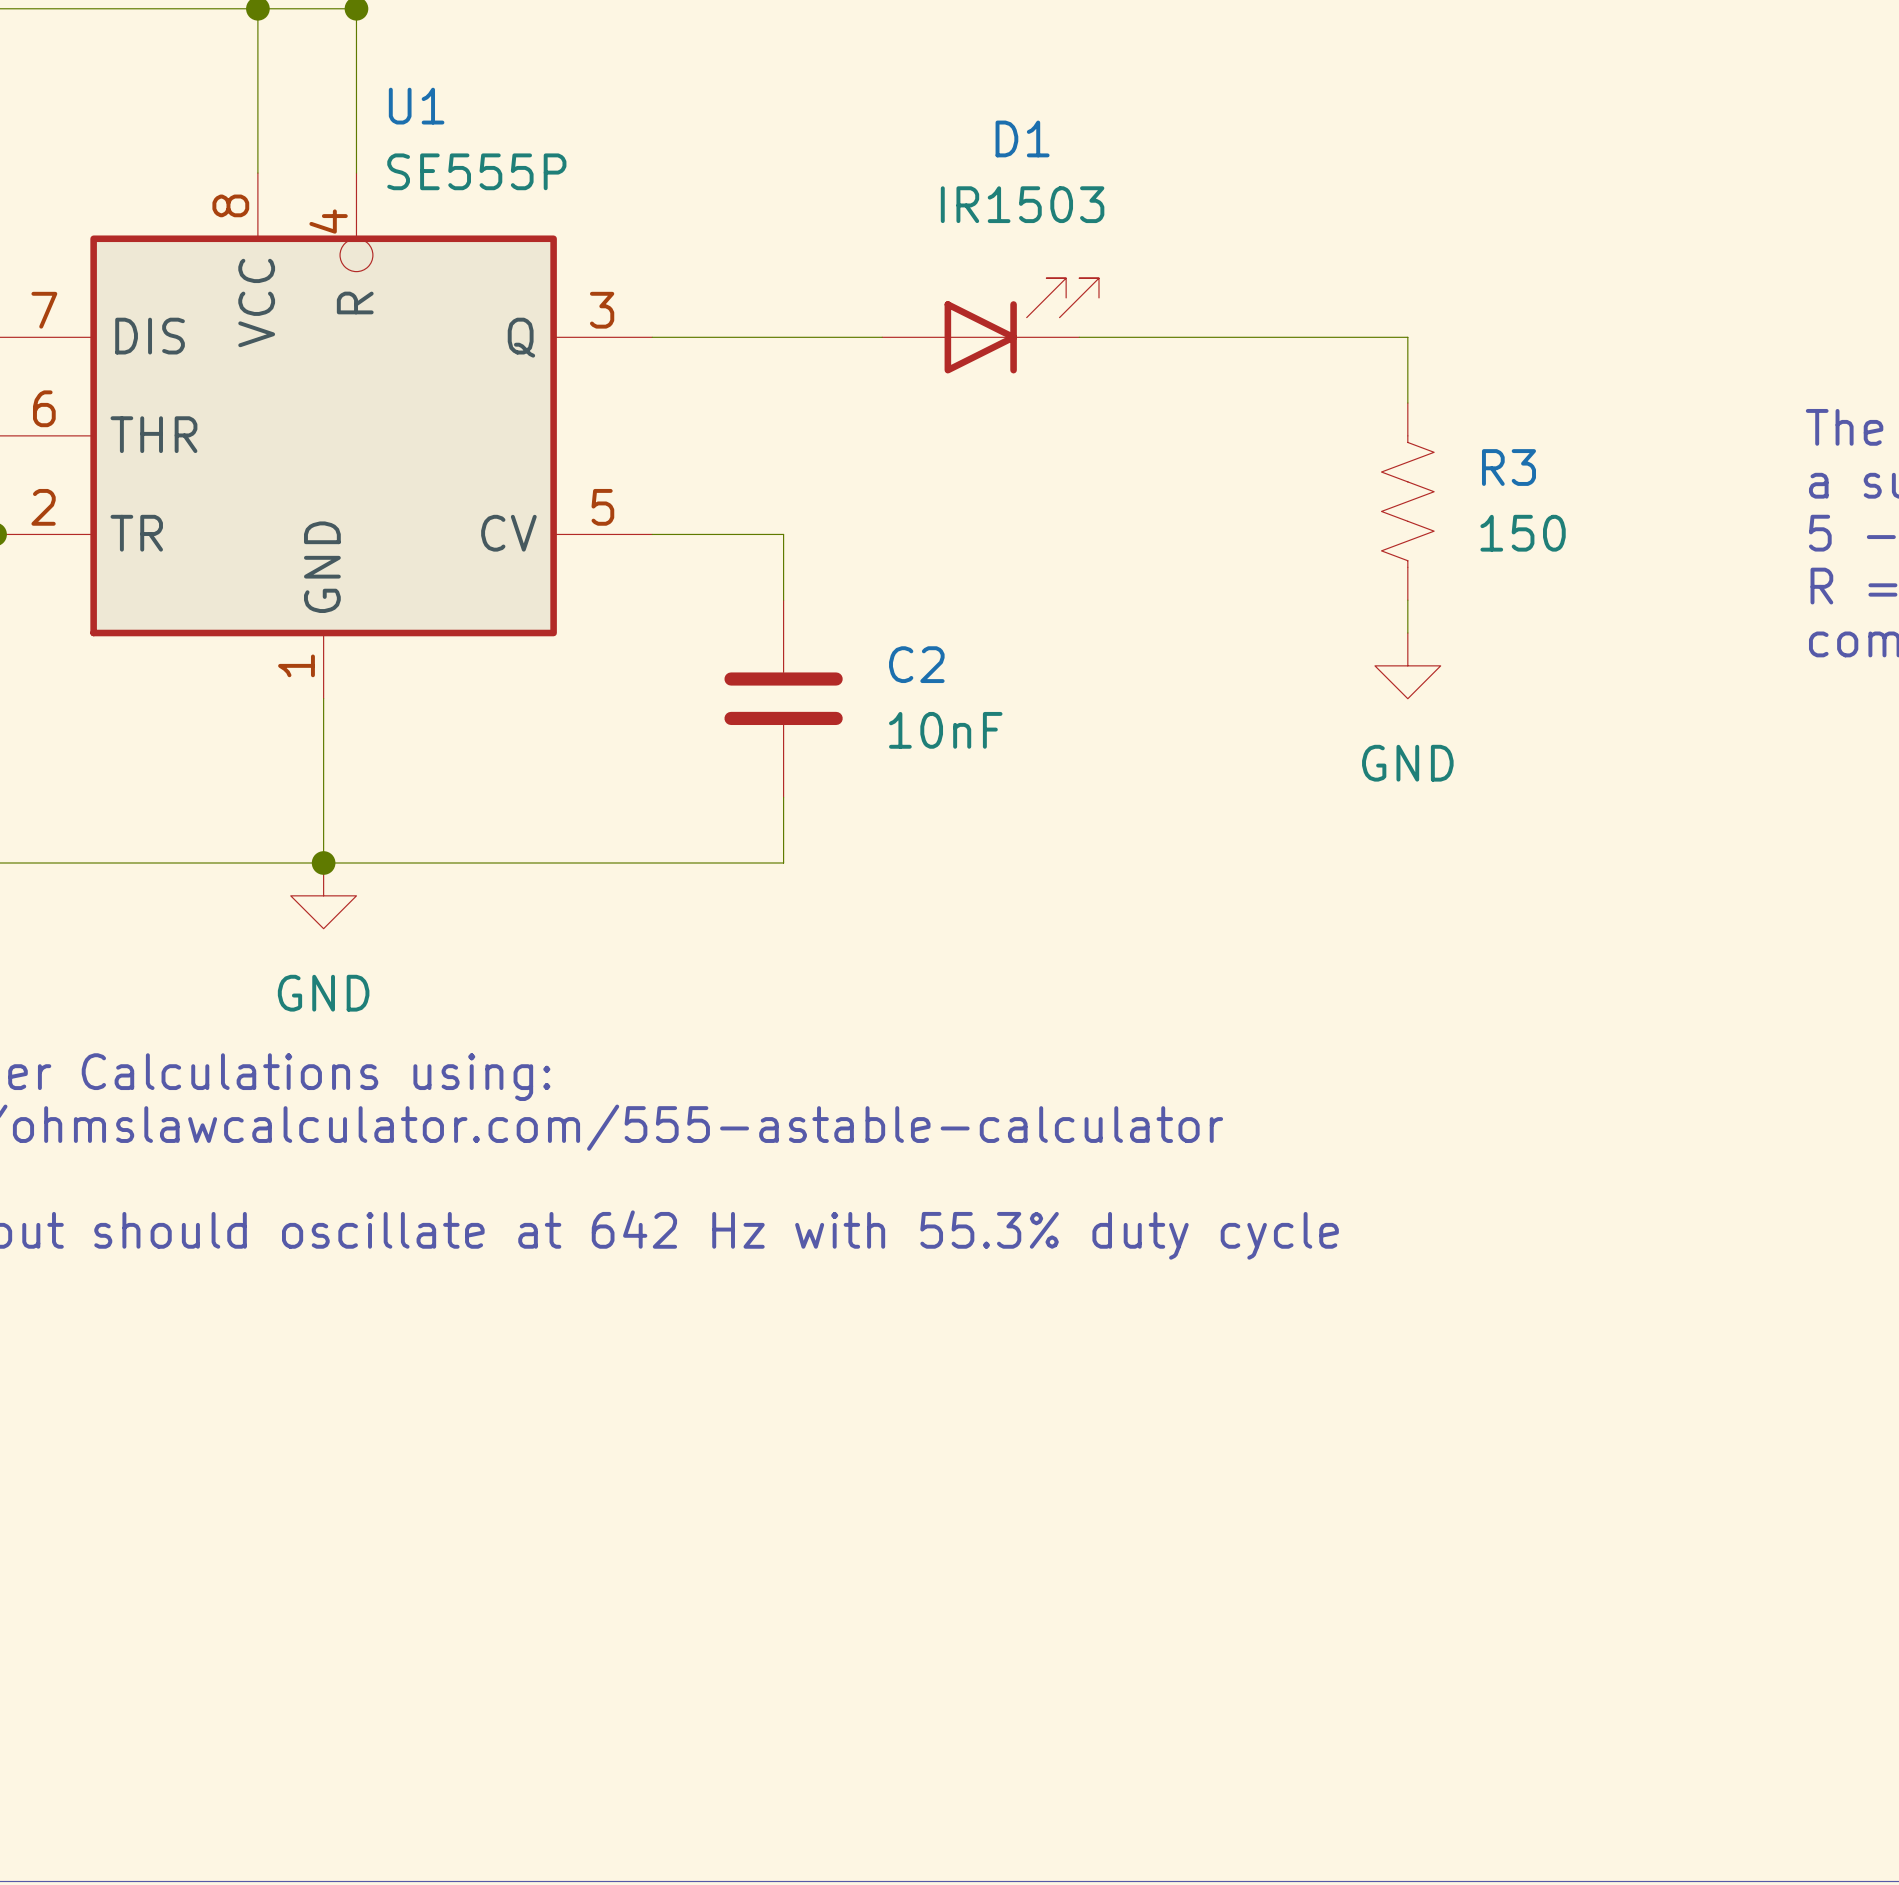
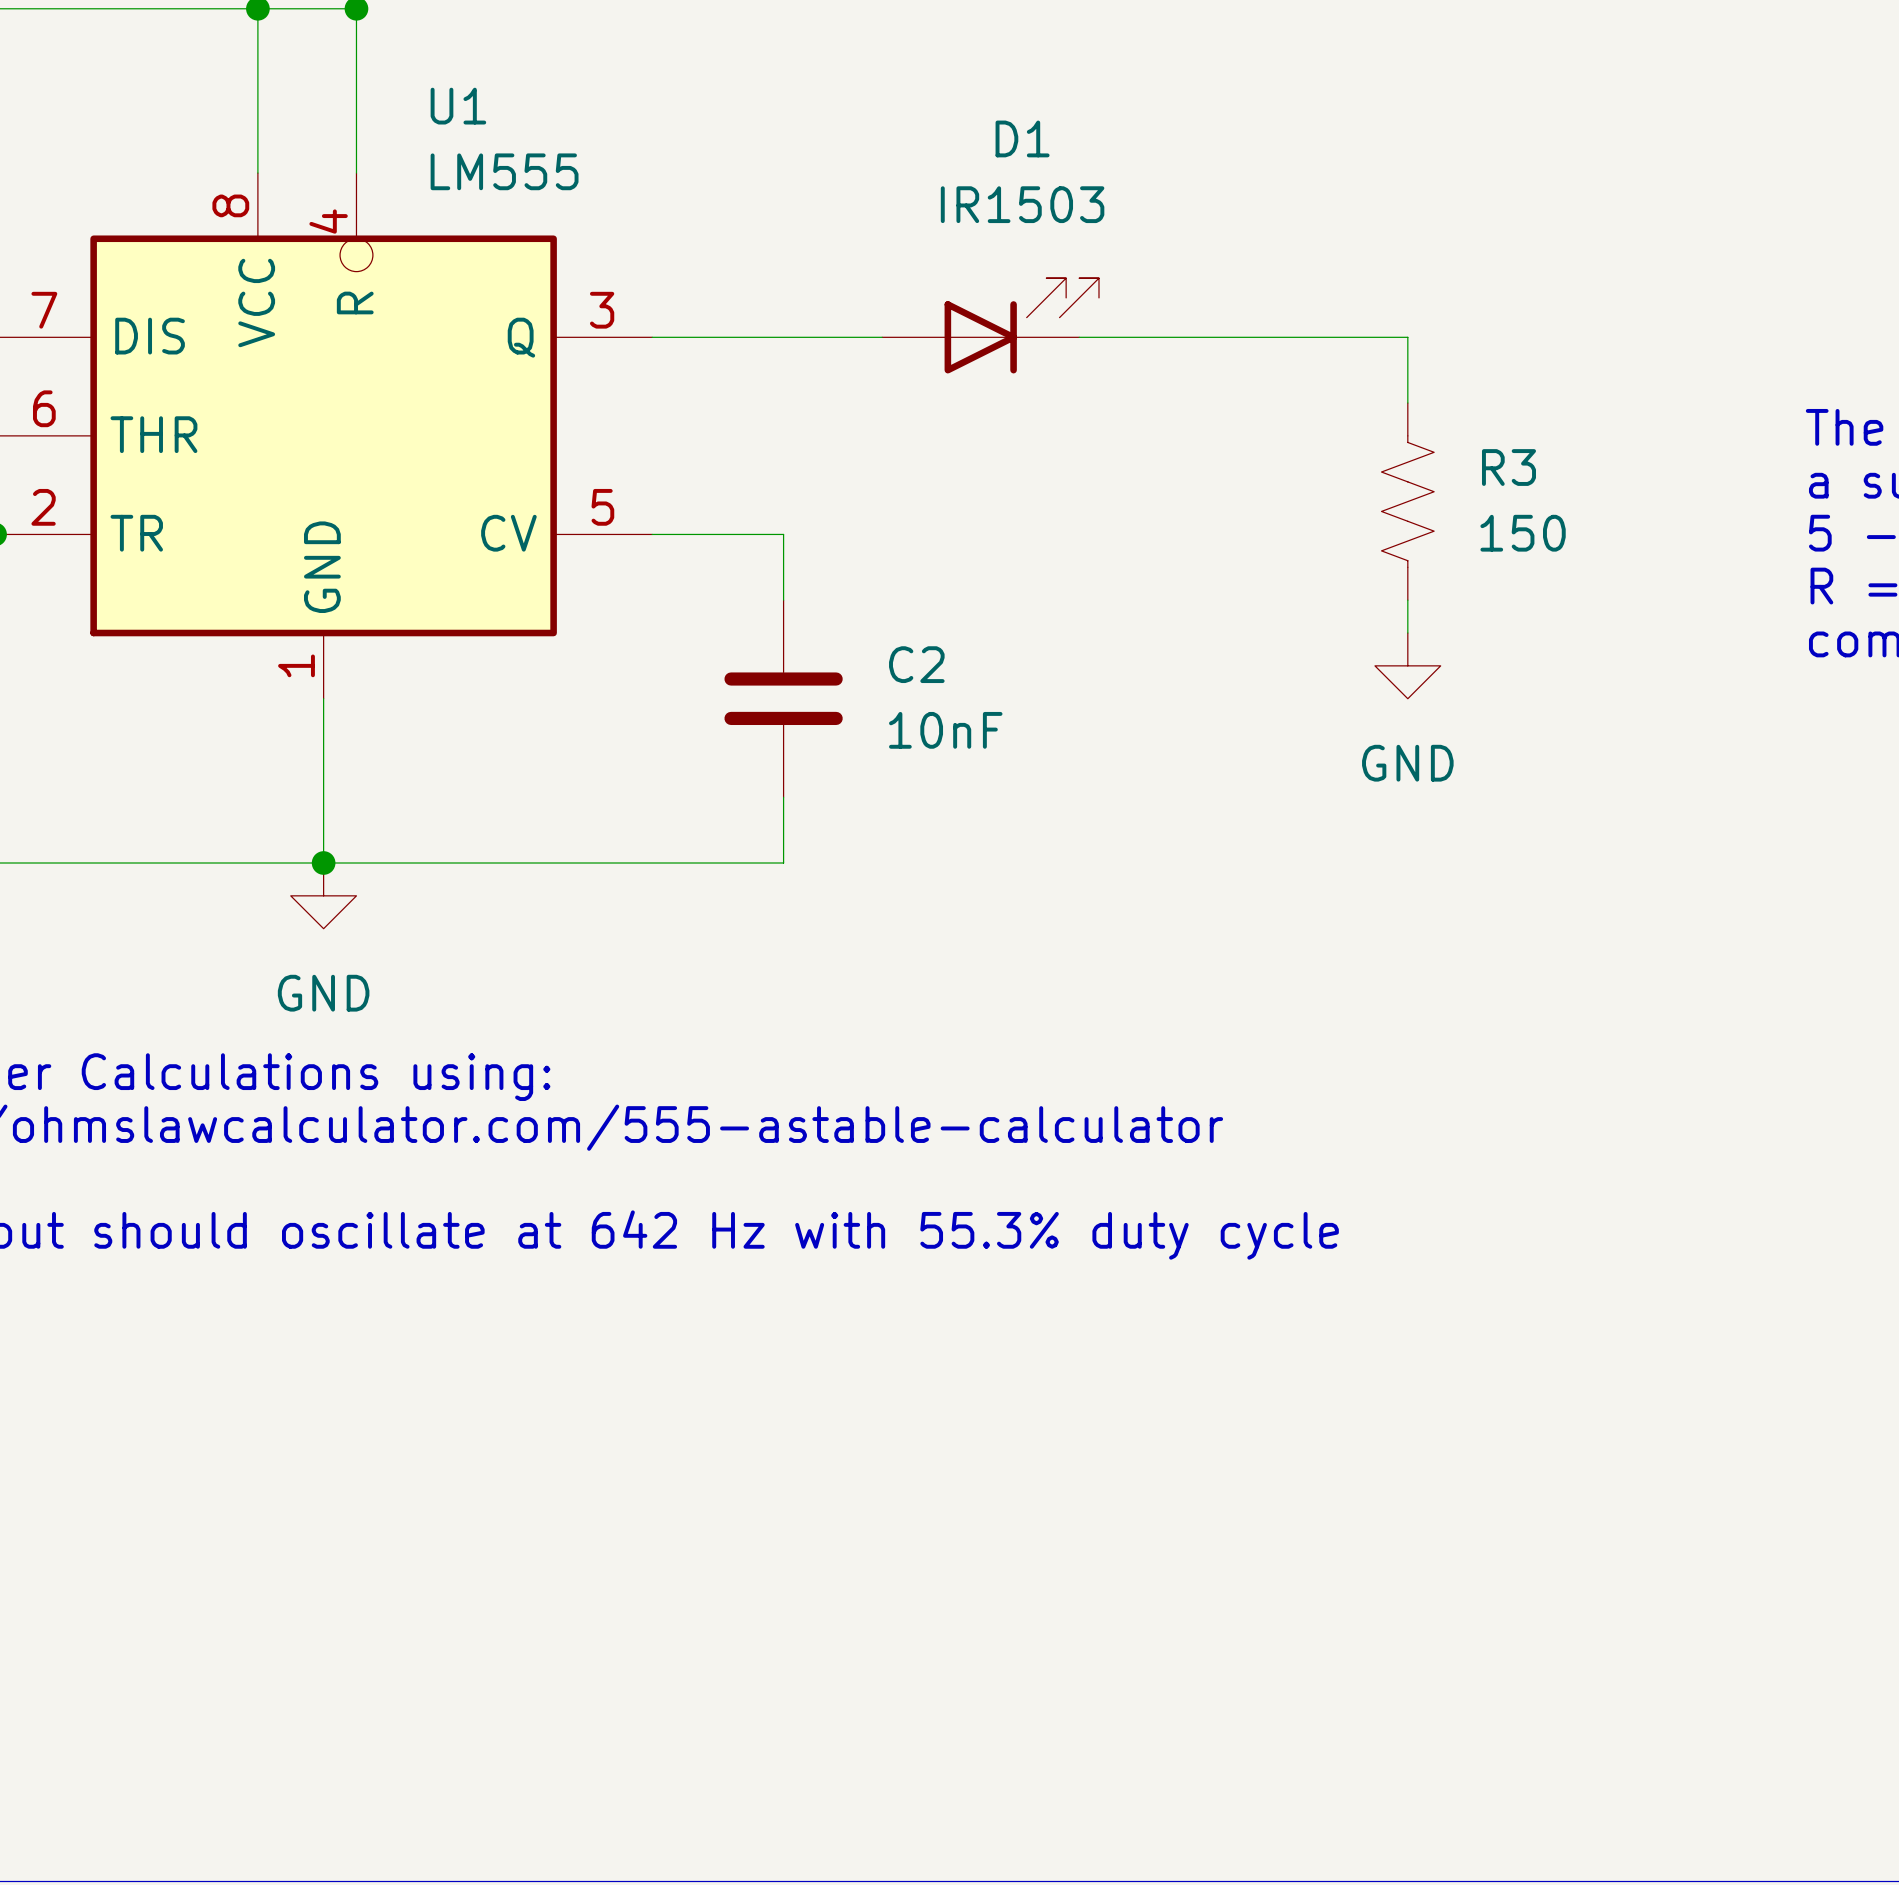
U1 name position: U1 (416, 106) -> U1 (458, 106)
U1 value: SE555P (476, 171) -> LM555 (504, 171)

